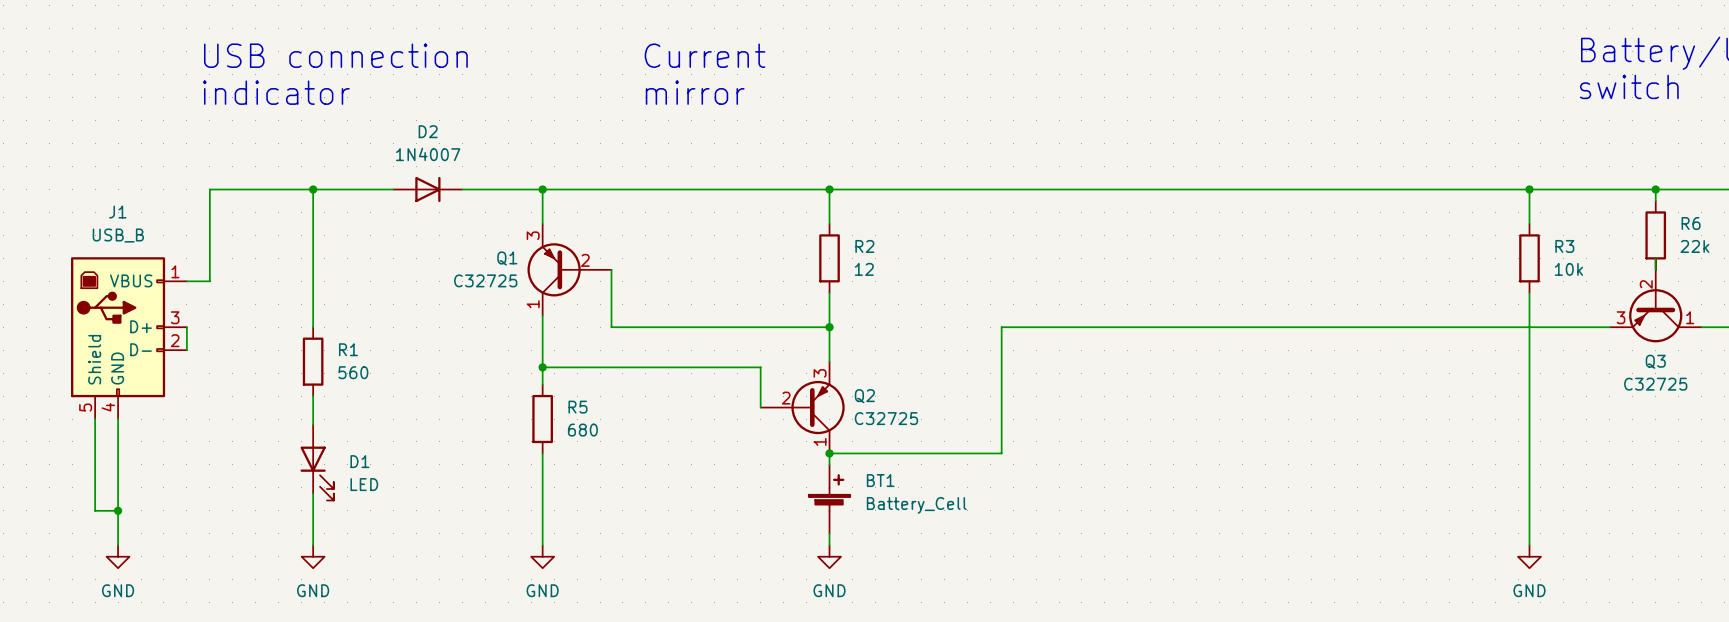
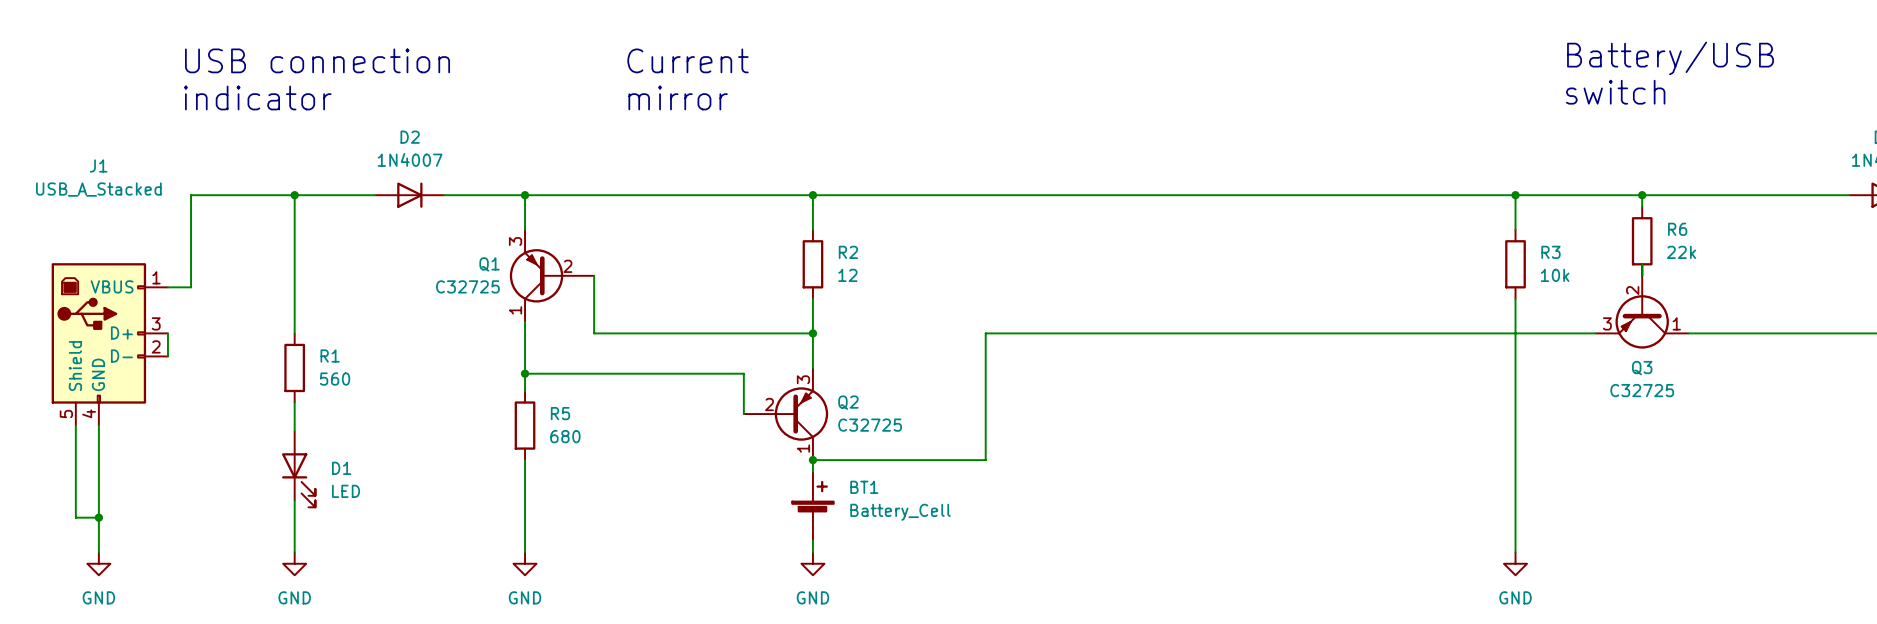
J1 name position: J1 (117, 212) -> J1 (98, 165)
J1 value: USB_B (118, 235) -> USB_A_Stacked (98, 189)

